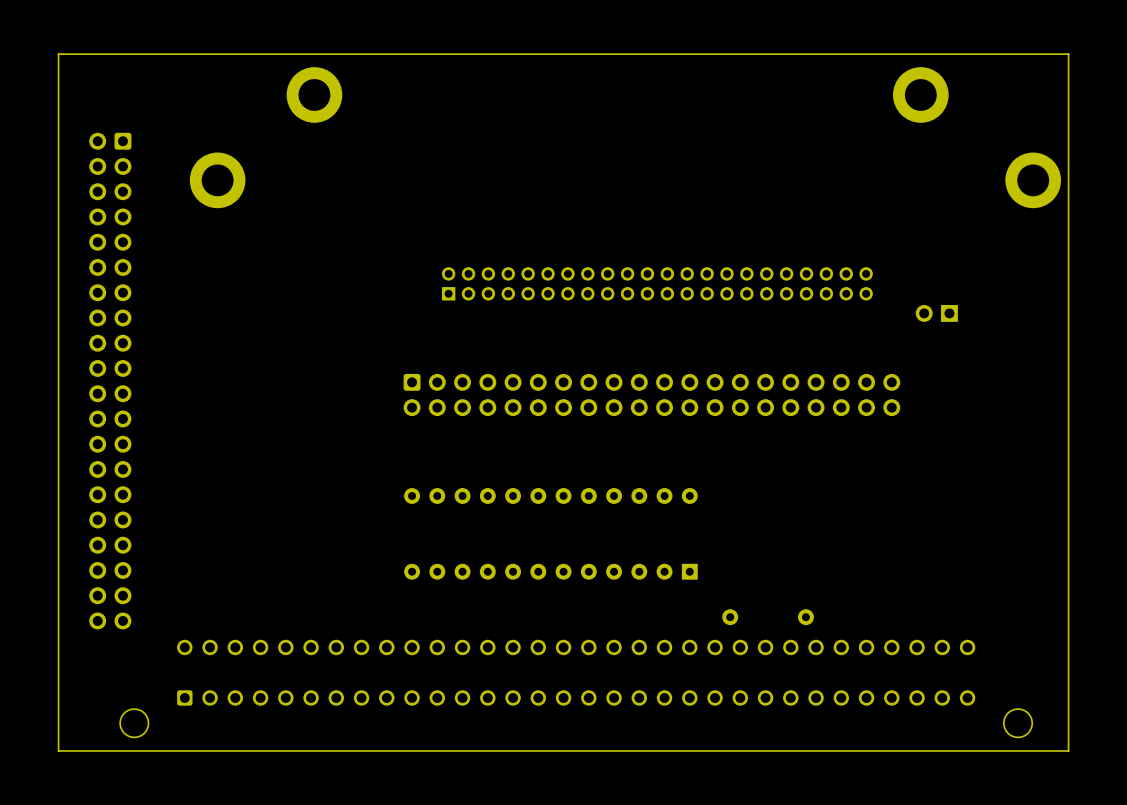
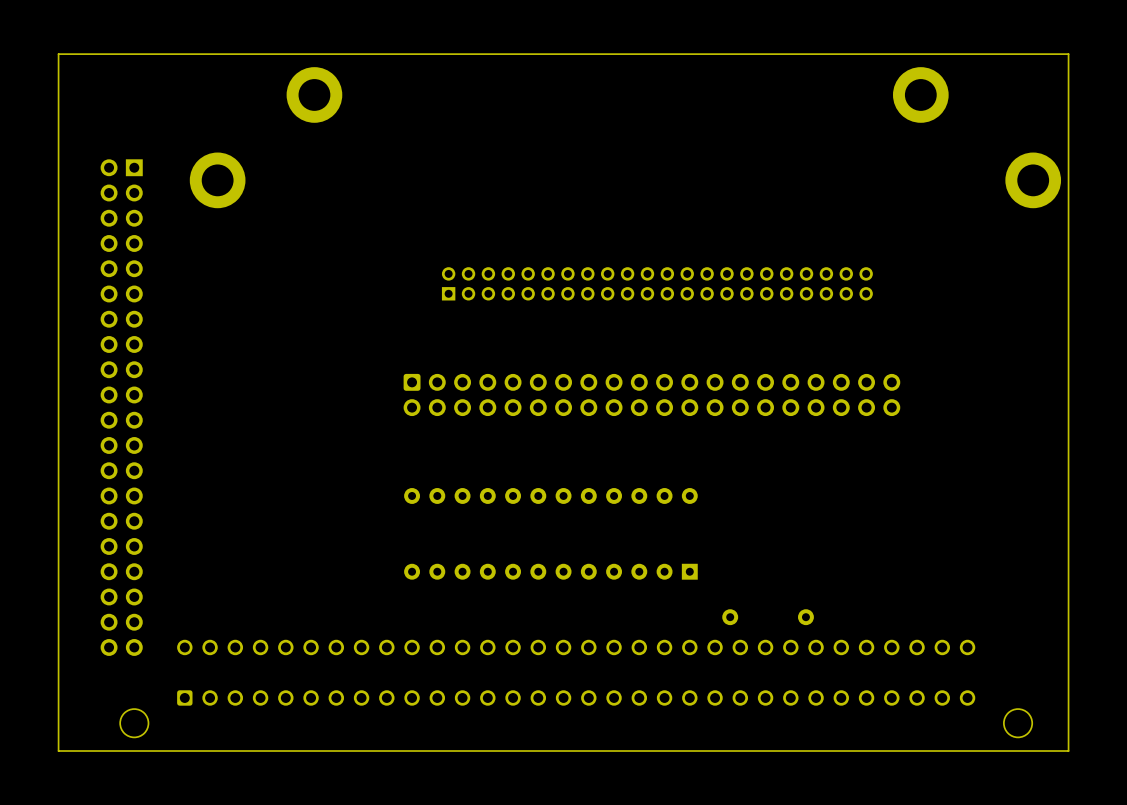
part: (936, 313) -> none
part: (110, 381) -> none
part: none -> (121, 407)

